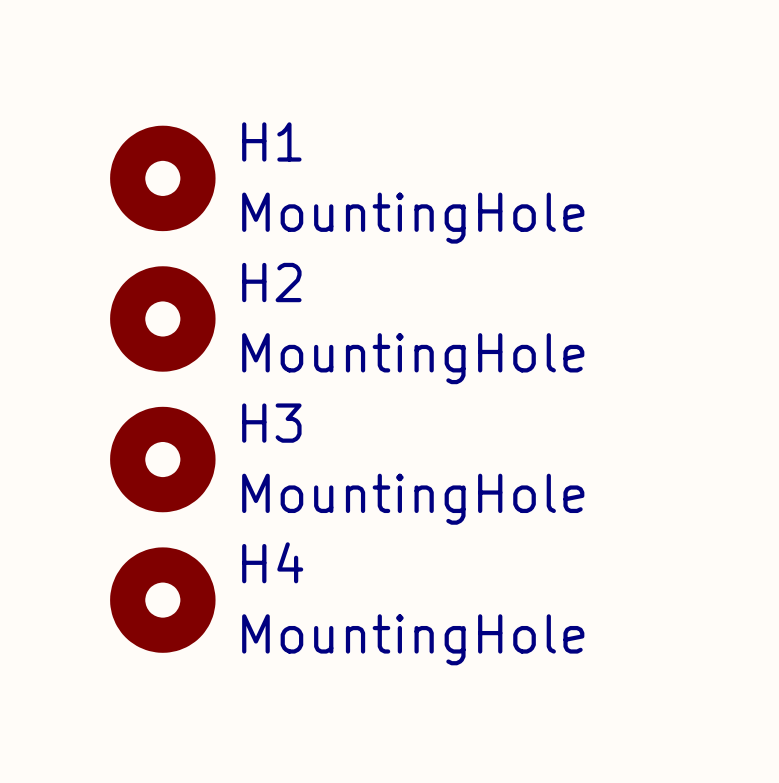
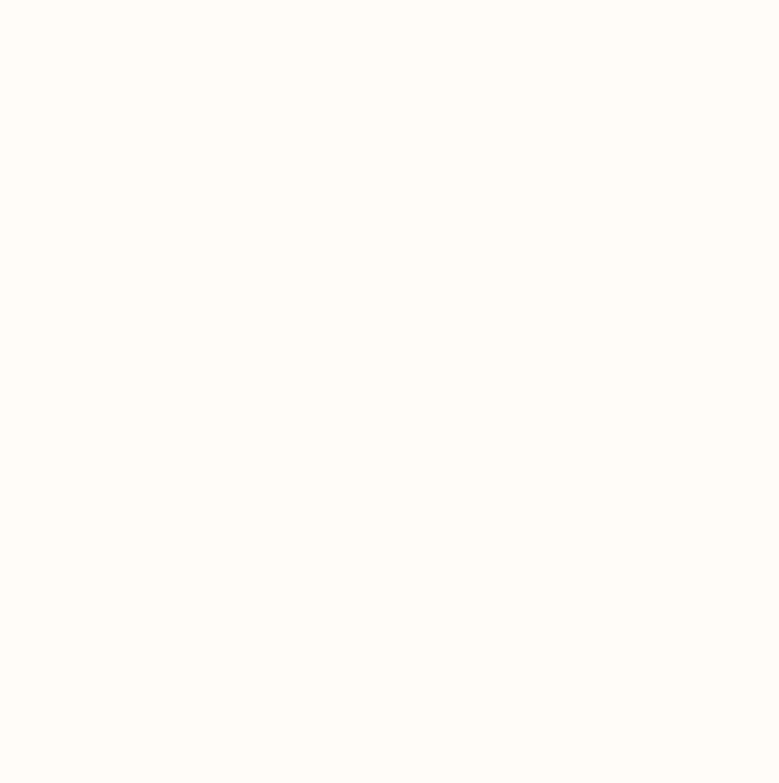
H1: MountingHole (162, 178) -> none
H2: MountingHole (162, 318) -> none
H3: MountingHole (162, 459) -> none
H4: MountingHole (162, 600) -> none

